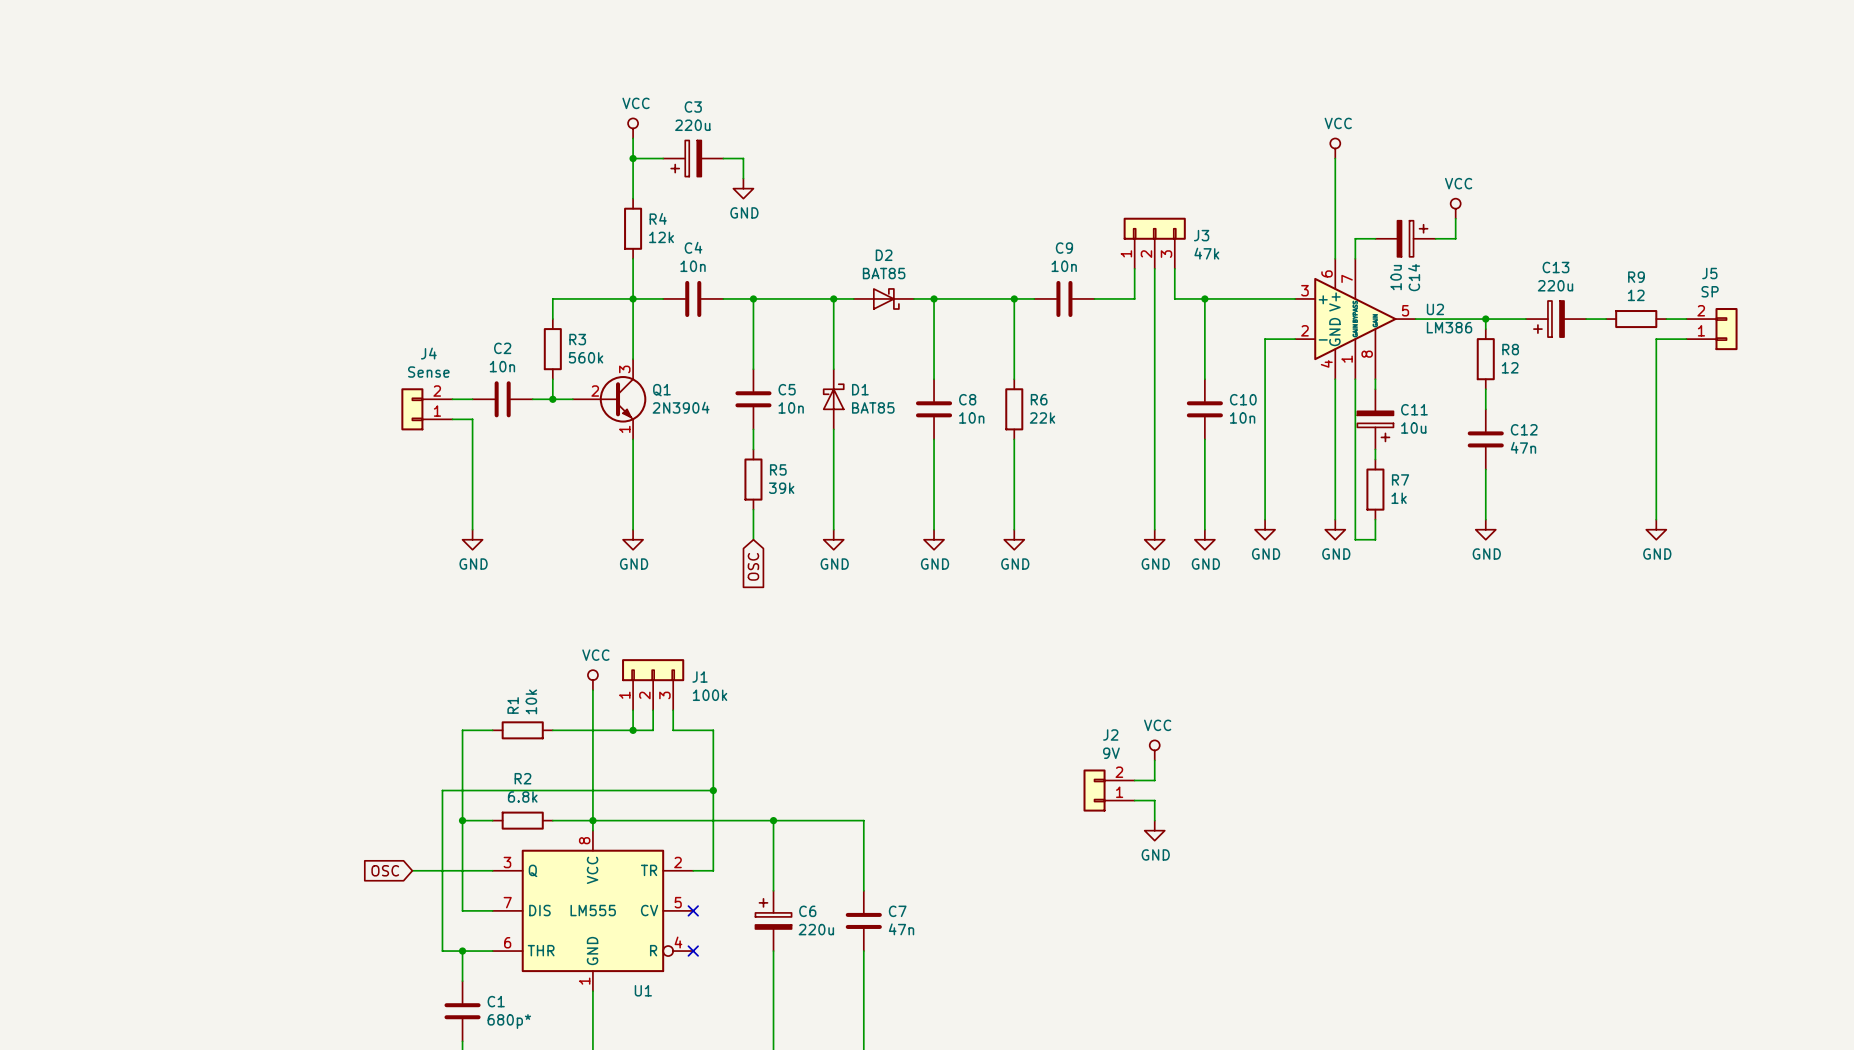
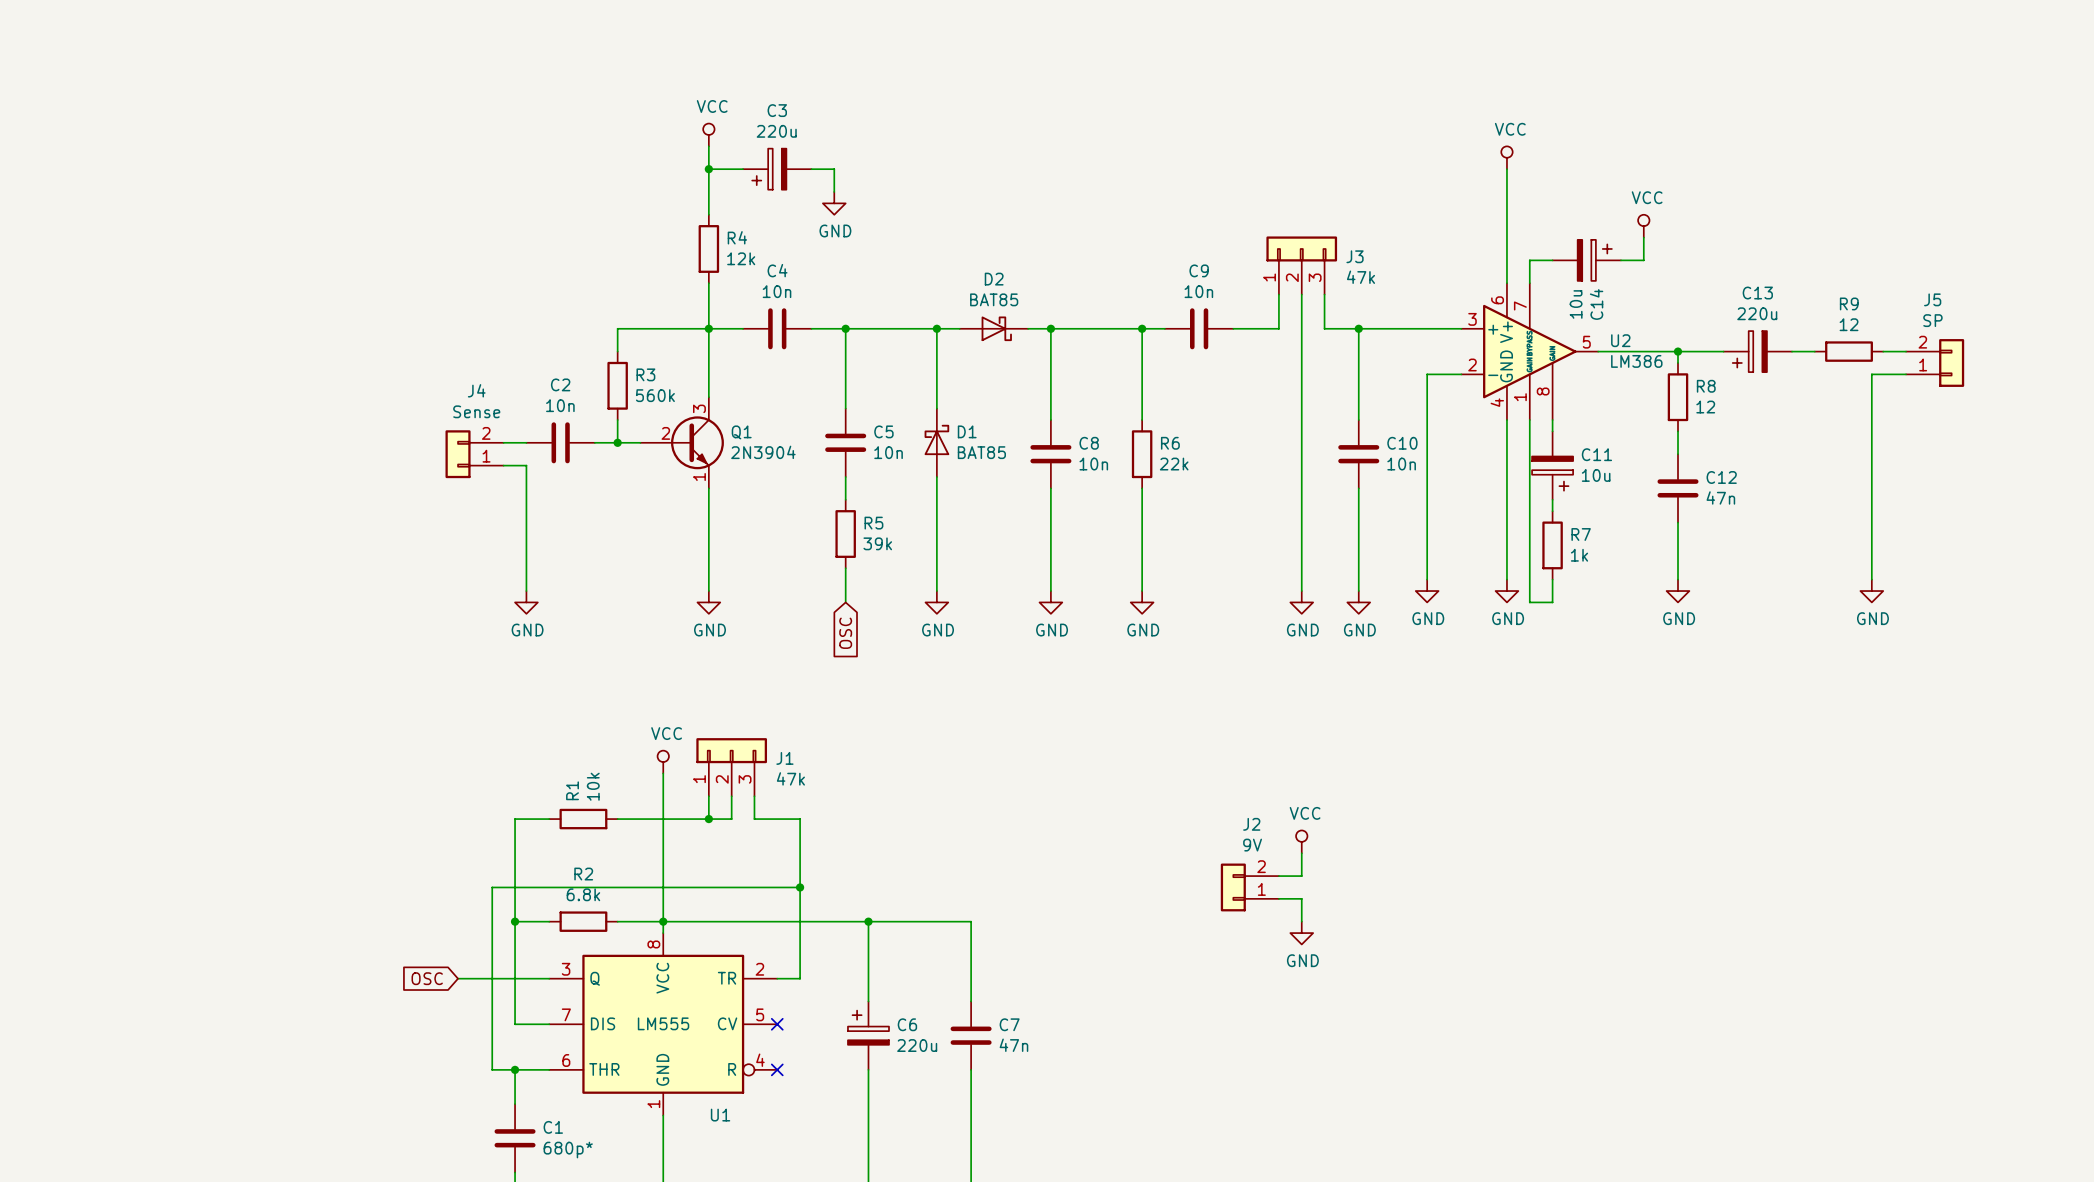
J1 value: 100k (710, 695) -> 47k (790, 778)

